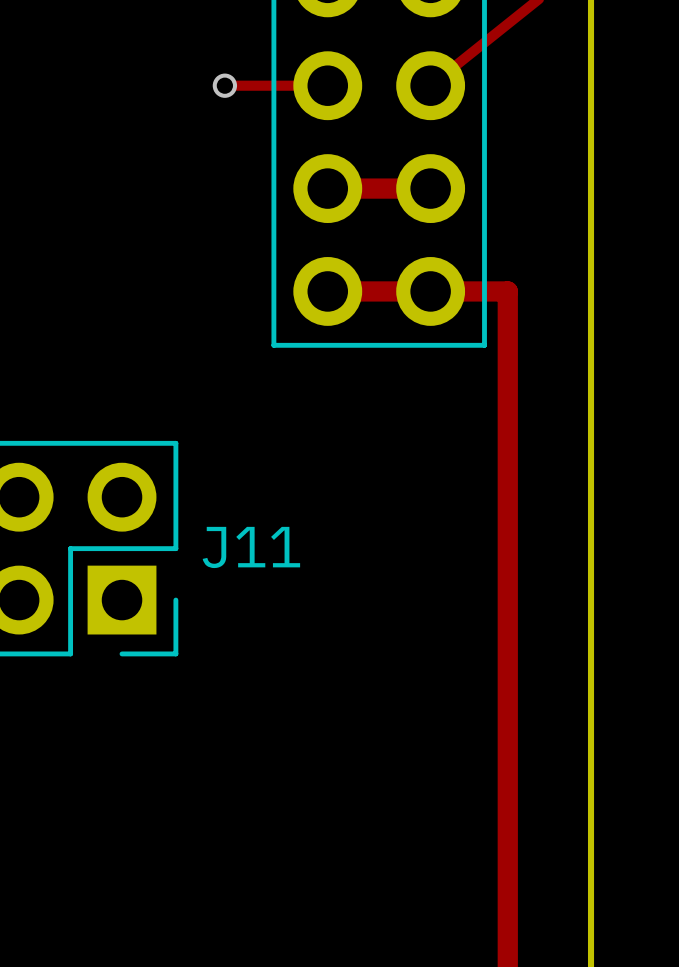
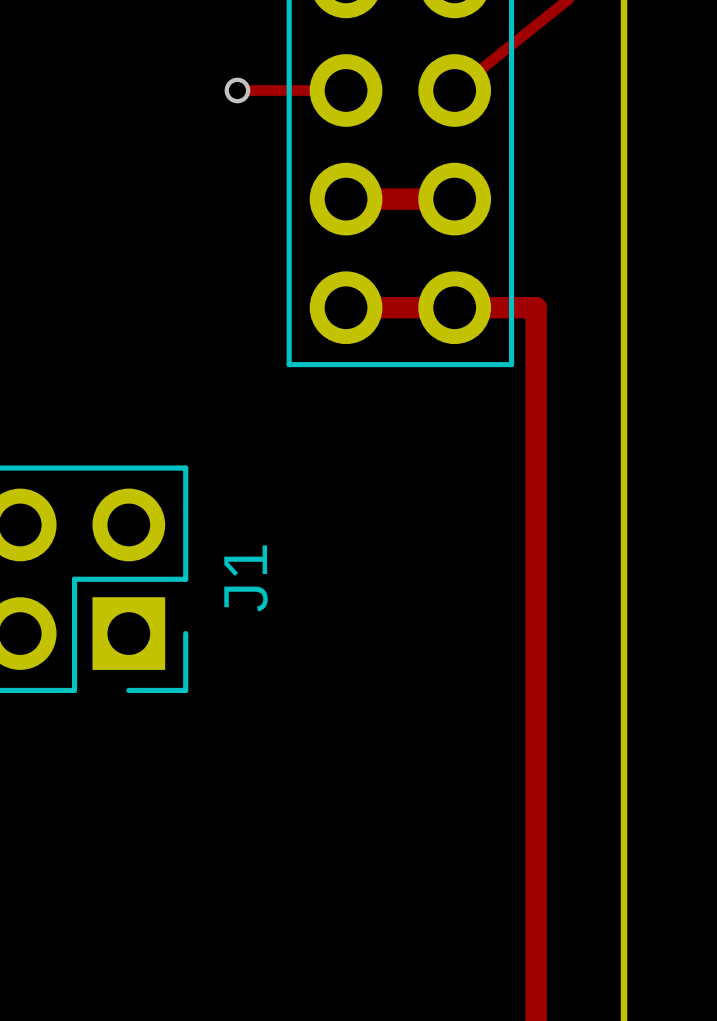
J11 name: J11 (251, 547) -> J1 (246, 578)

